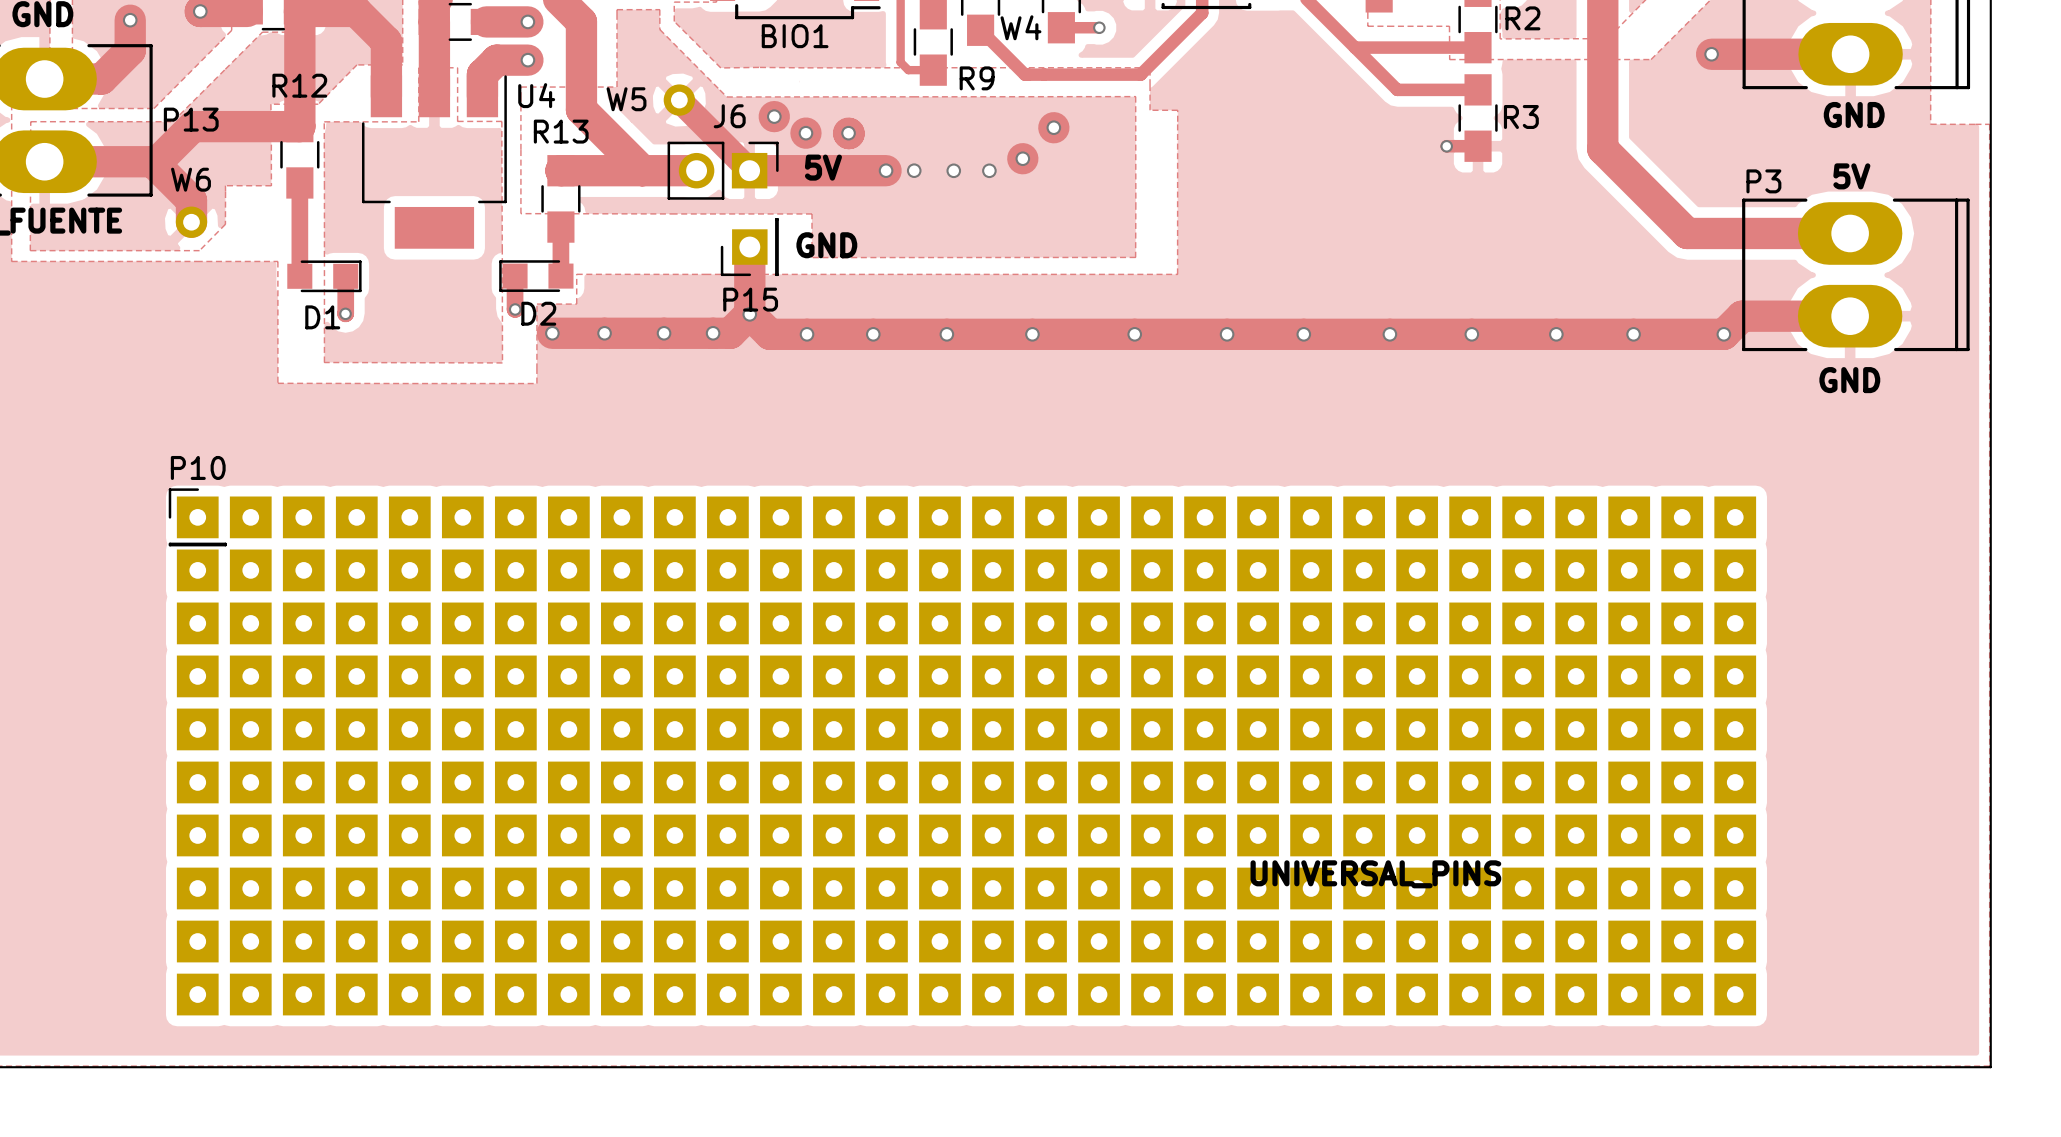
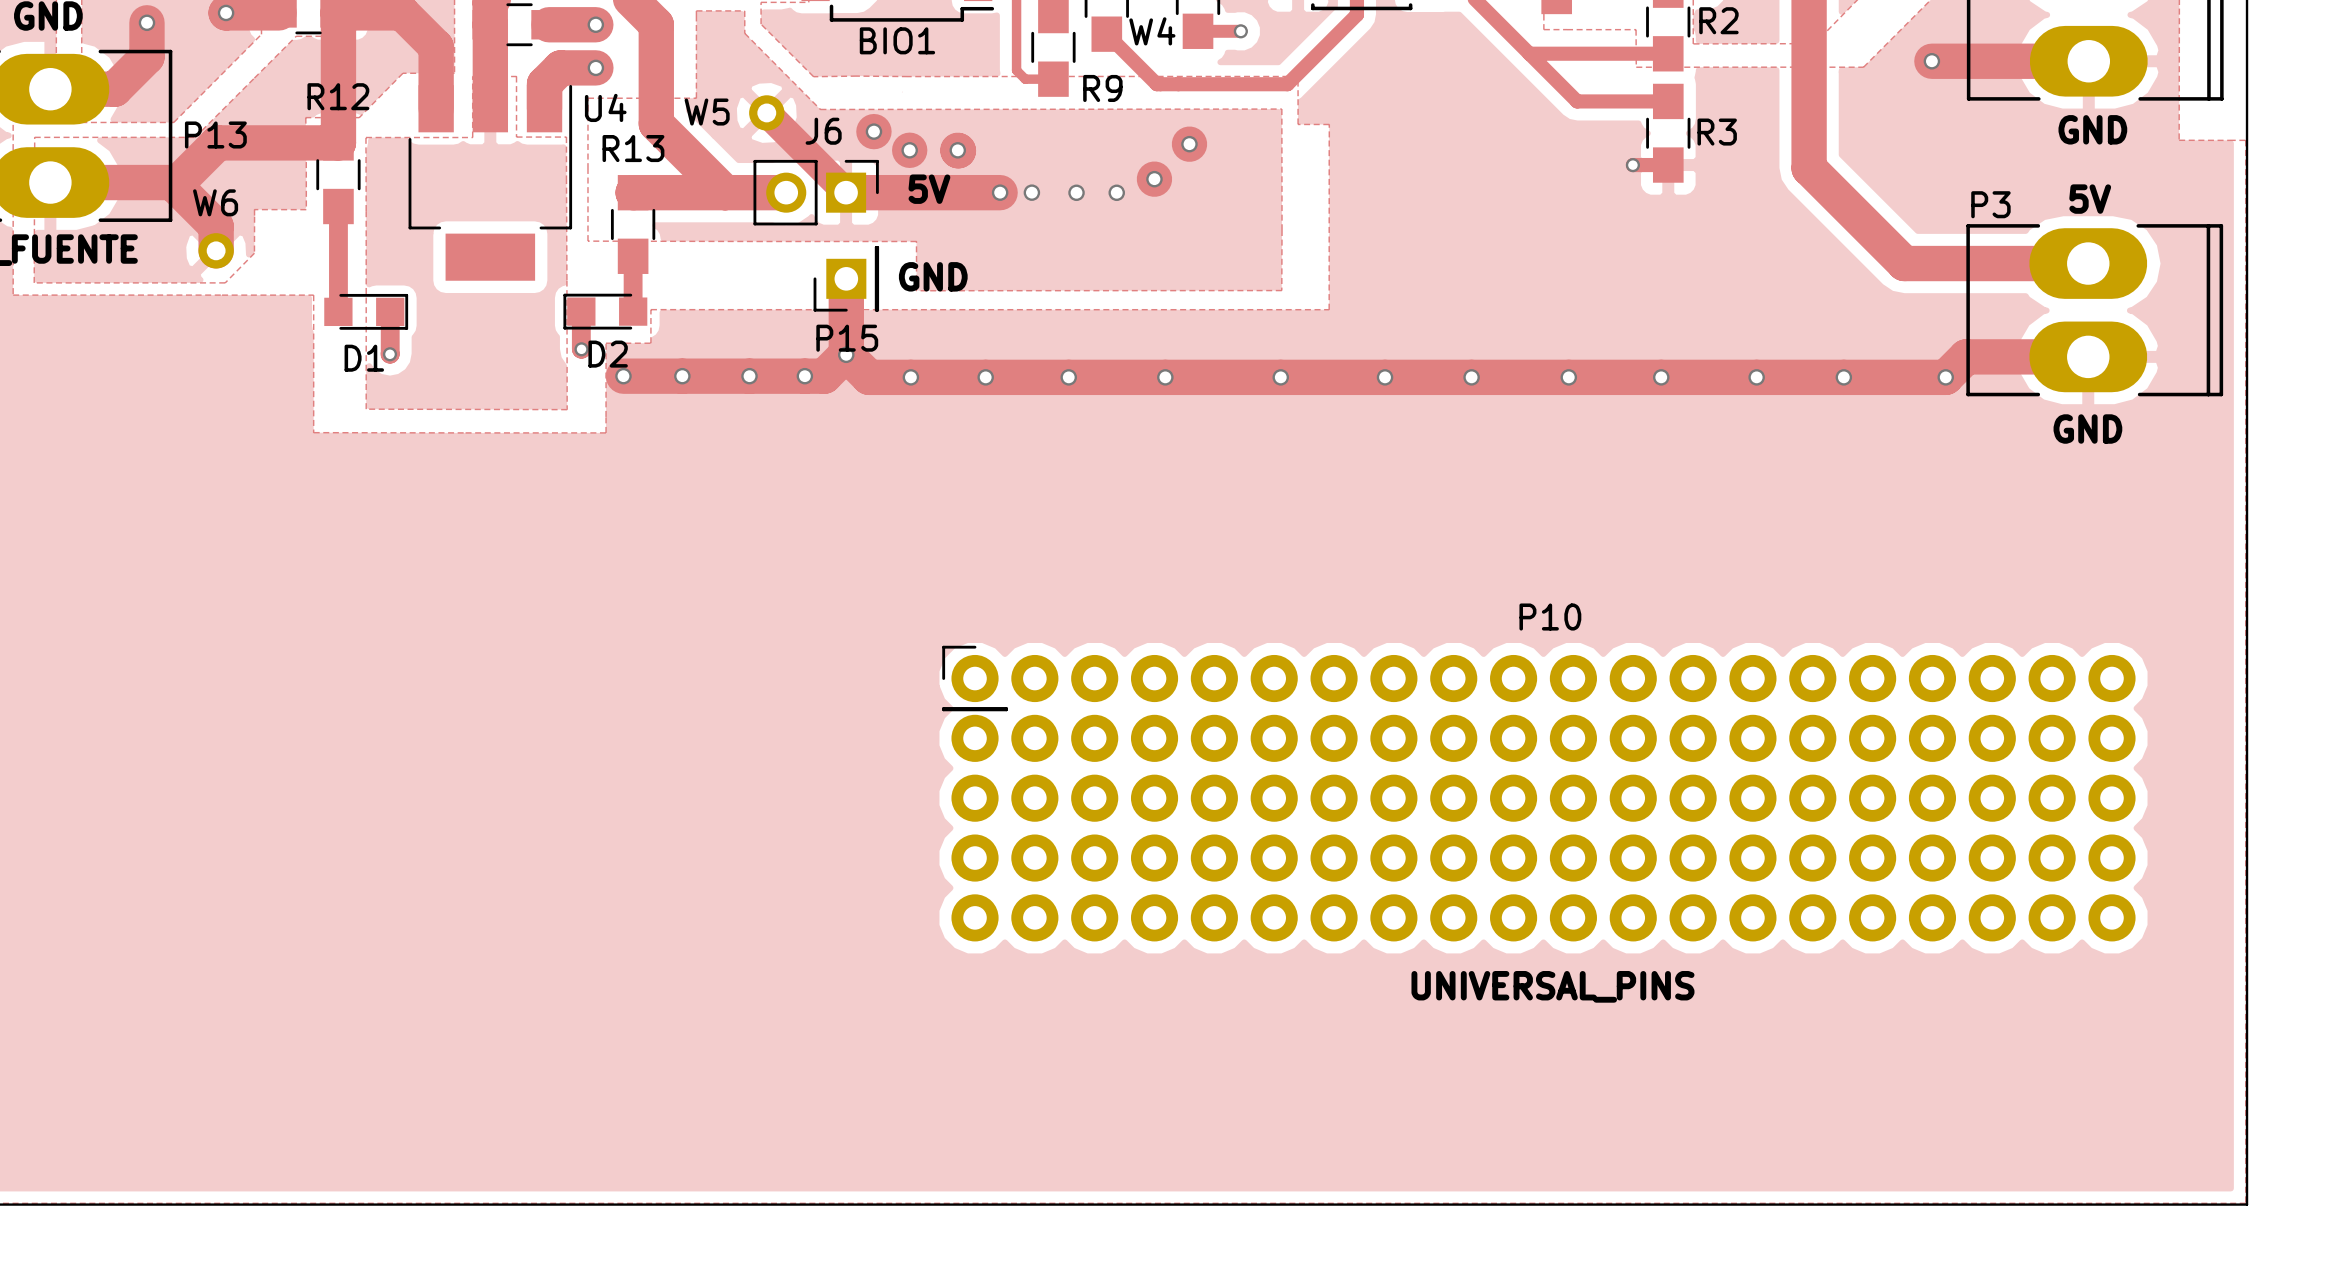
P10 name position: P10 (198, 467) -> P10 (1550, 617)
P10 footprint: [168, 488, 1757, 1016] -> [942, 645, 2136, 942]

